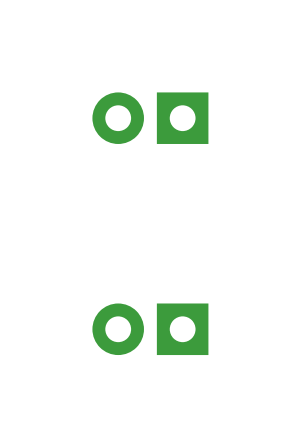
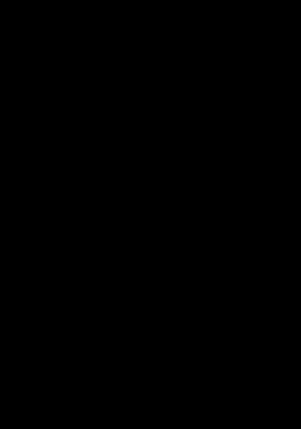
part: (150, 118) -> none
part: (150, 329) -> none

